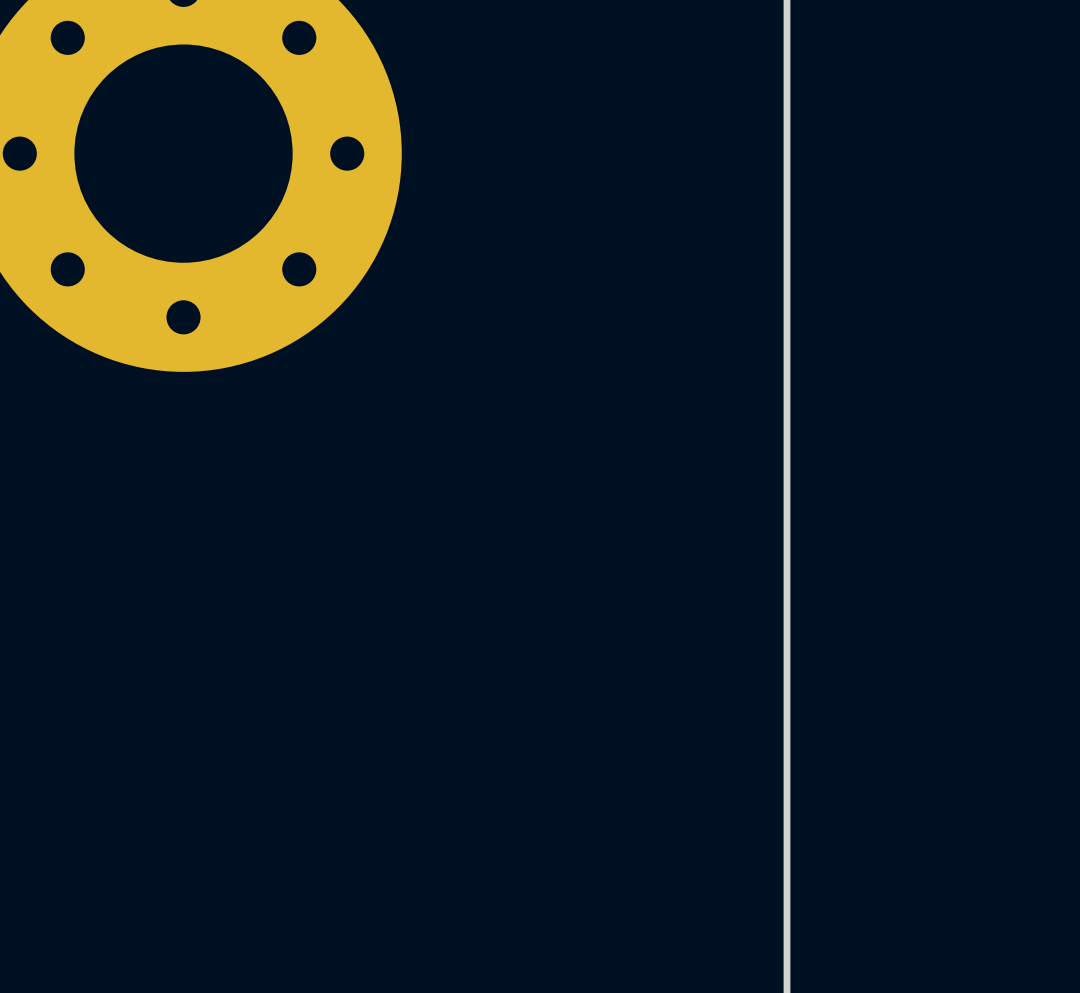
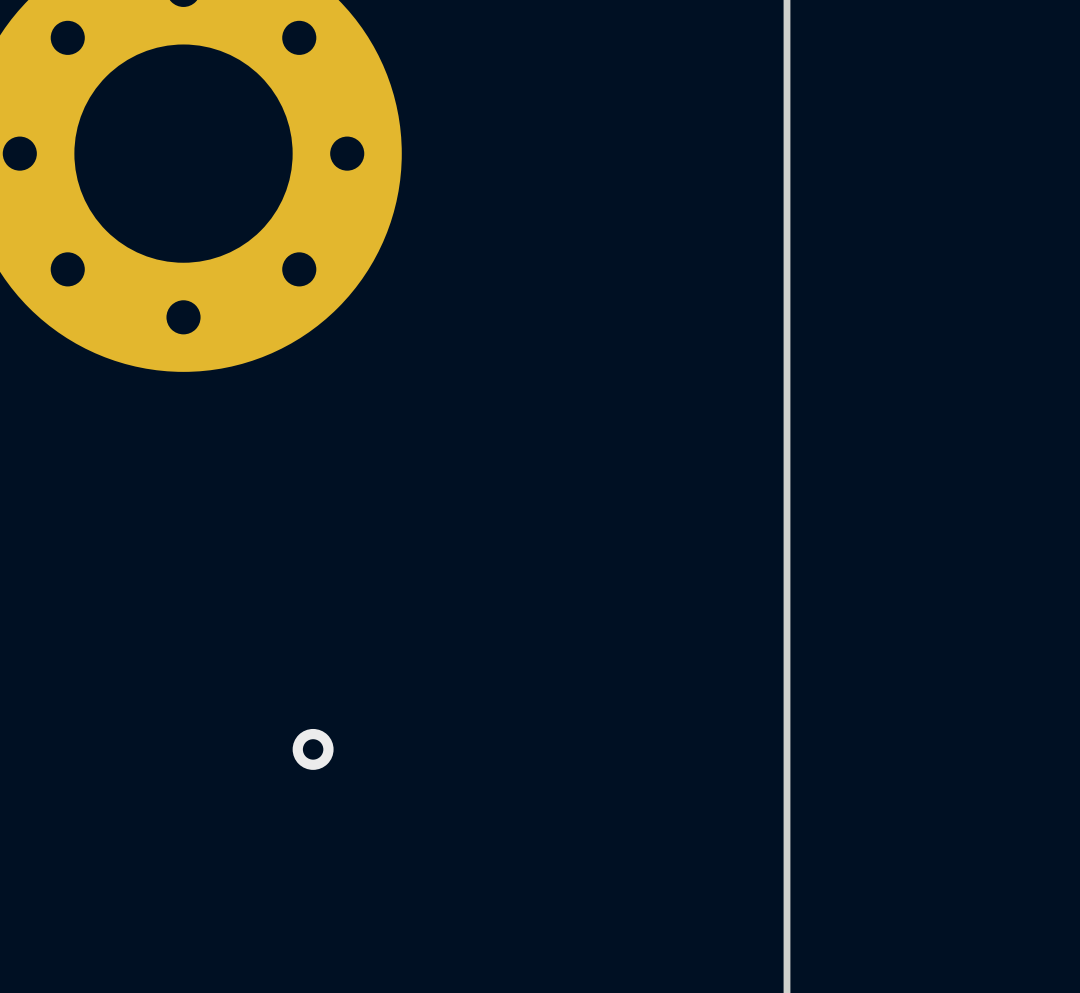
via: none -> (313, 749)

